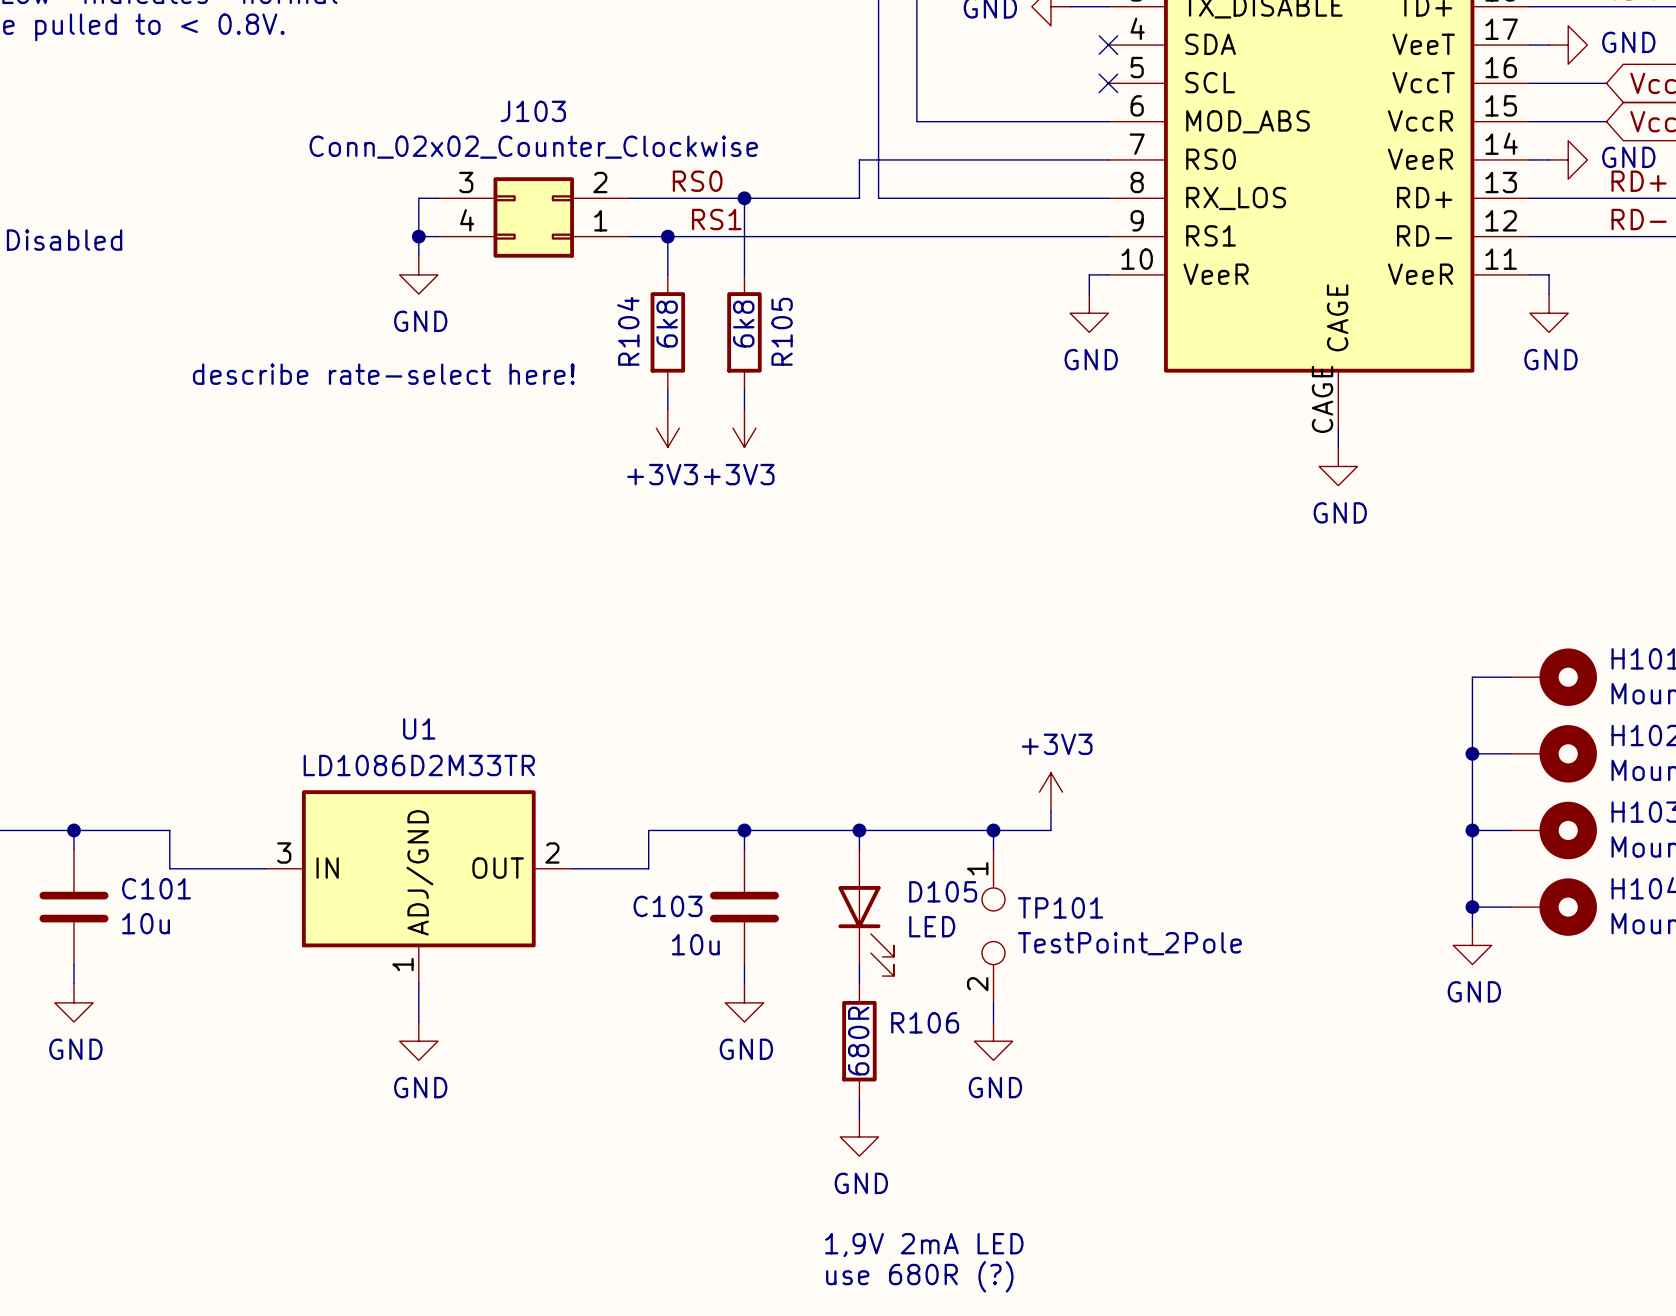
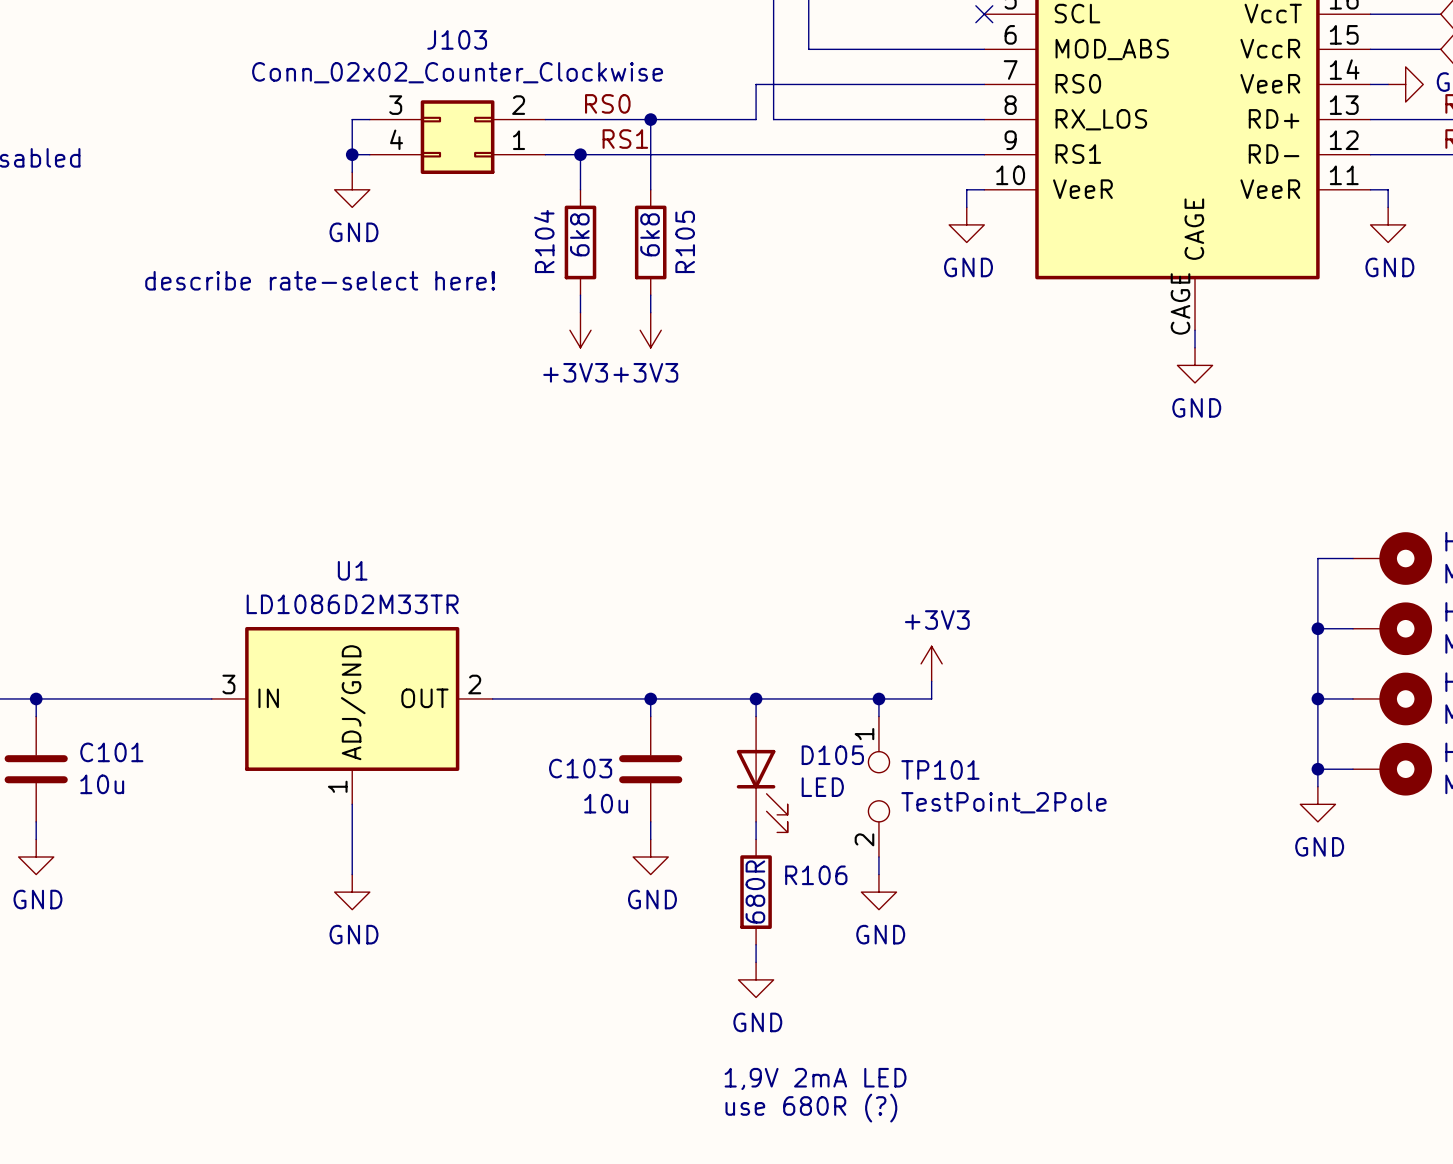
wire: (169, 830) (169, 868) (265, 868) -> (123, 698) (211, 698)
wire: (648, 830) (648, 868) (572, 868) -> (562, 698) (492, 698)
U1 position: (418, 886) -> (352, 715)

